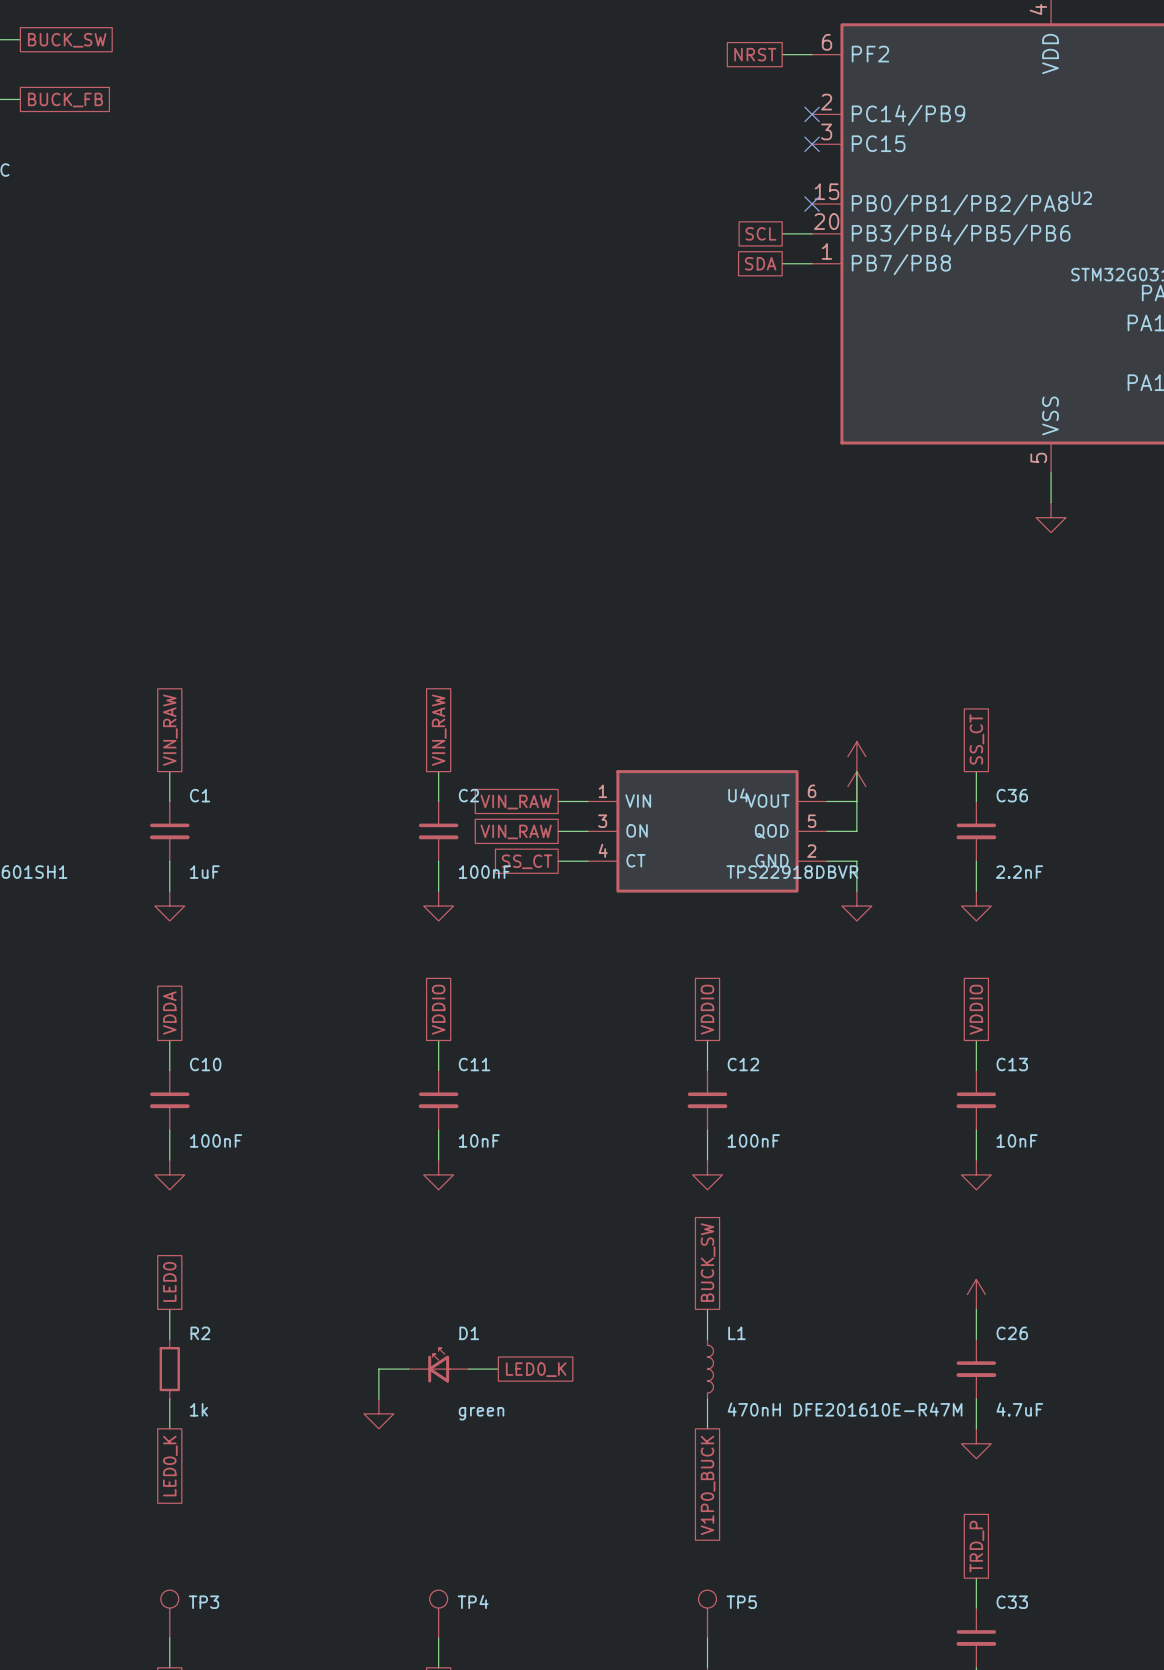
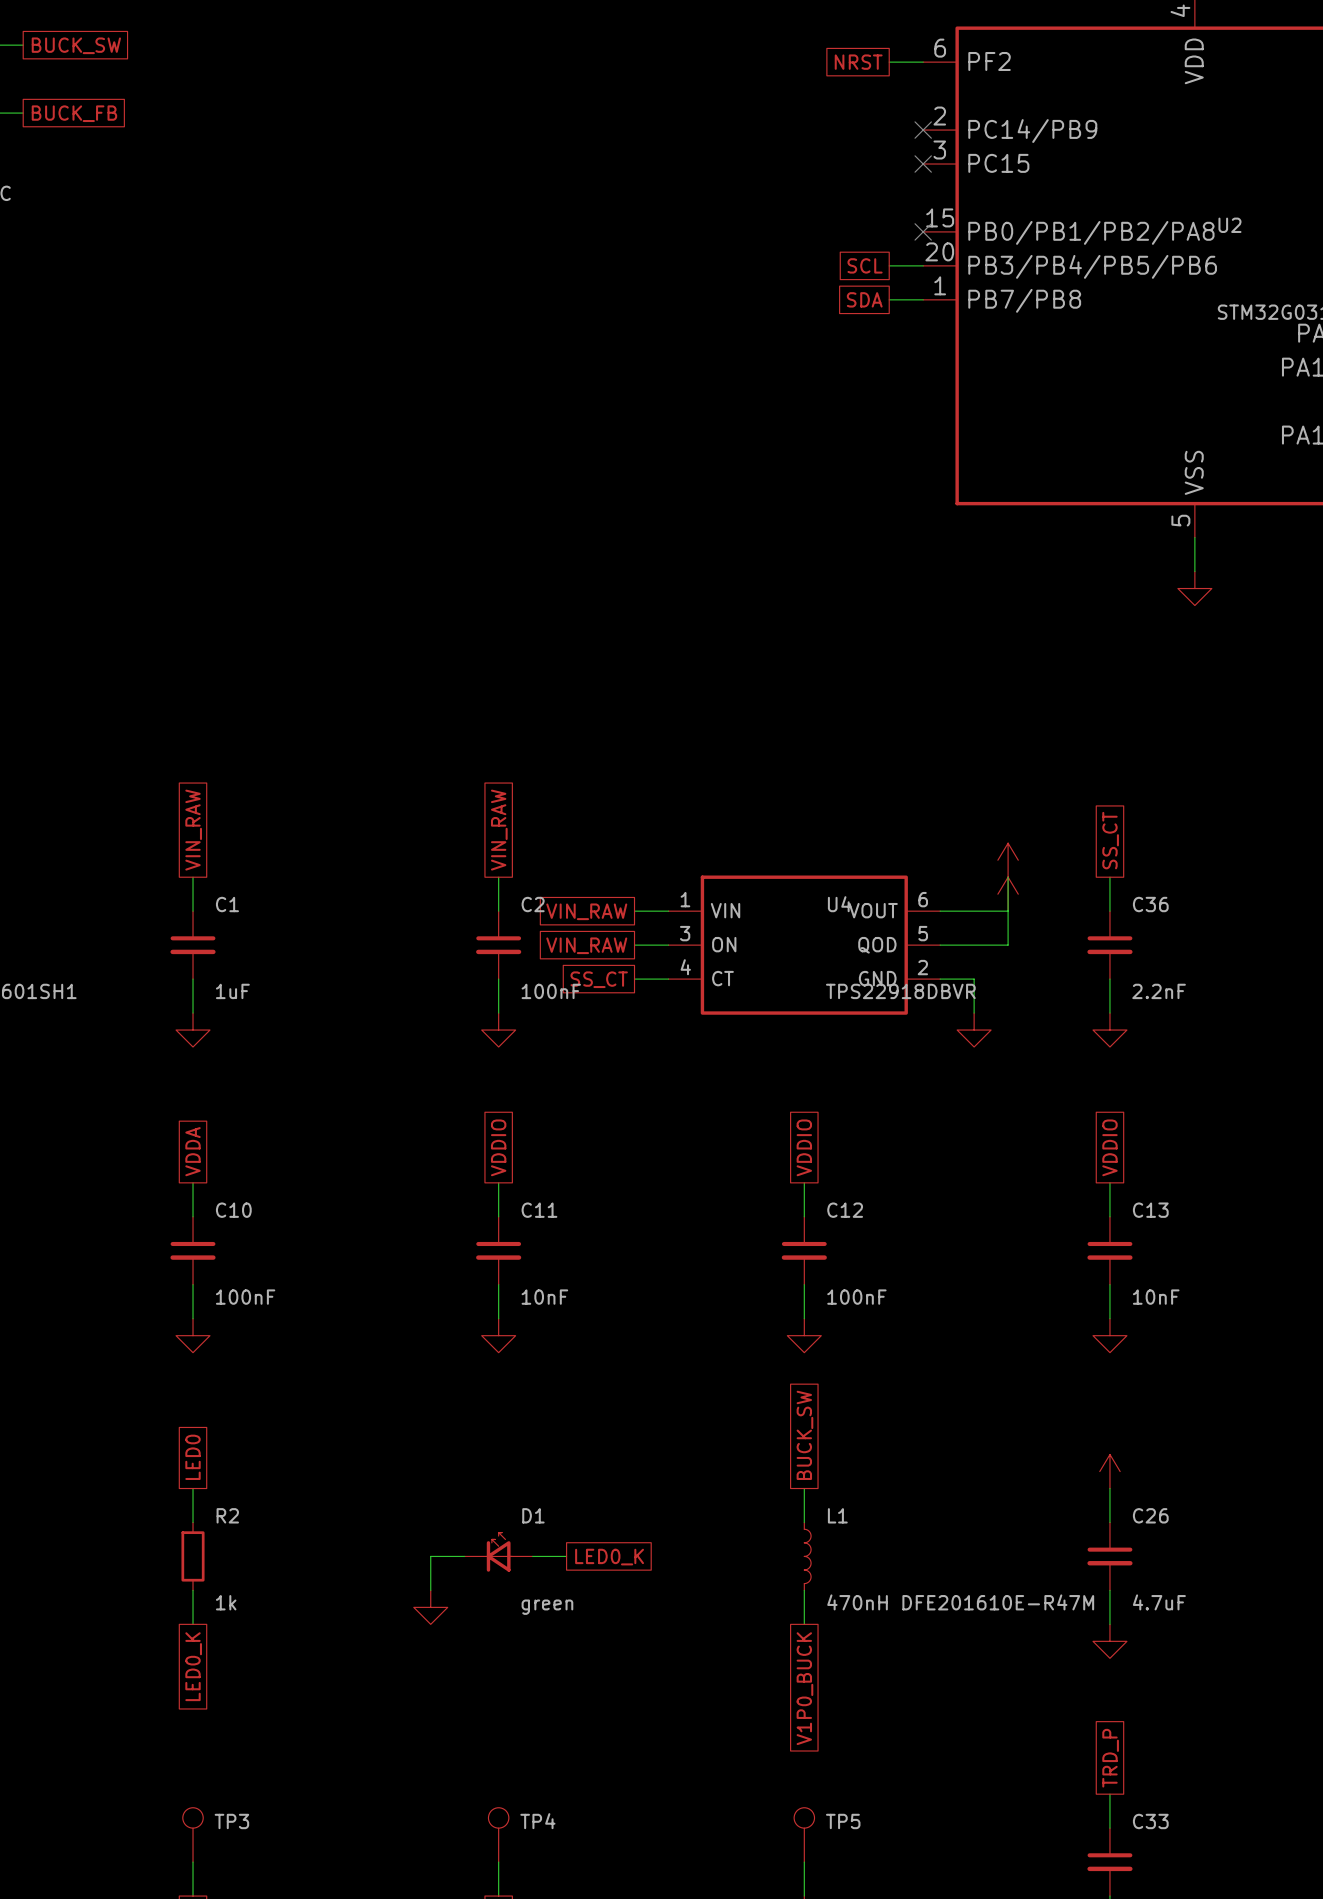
power symbol: (856, 756) -> none
power symbol: none -> (1008, 860)
wire: (856, 771) (856, 831) -> (1008, 877) (1008, 945) (974, 945)
power symbol: (856, 786) -> none
power symbol: none -> (1008, 894)
wire: none -> (974, 911) (1008, 911)

